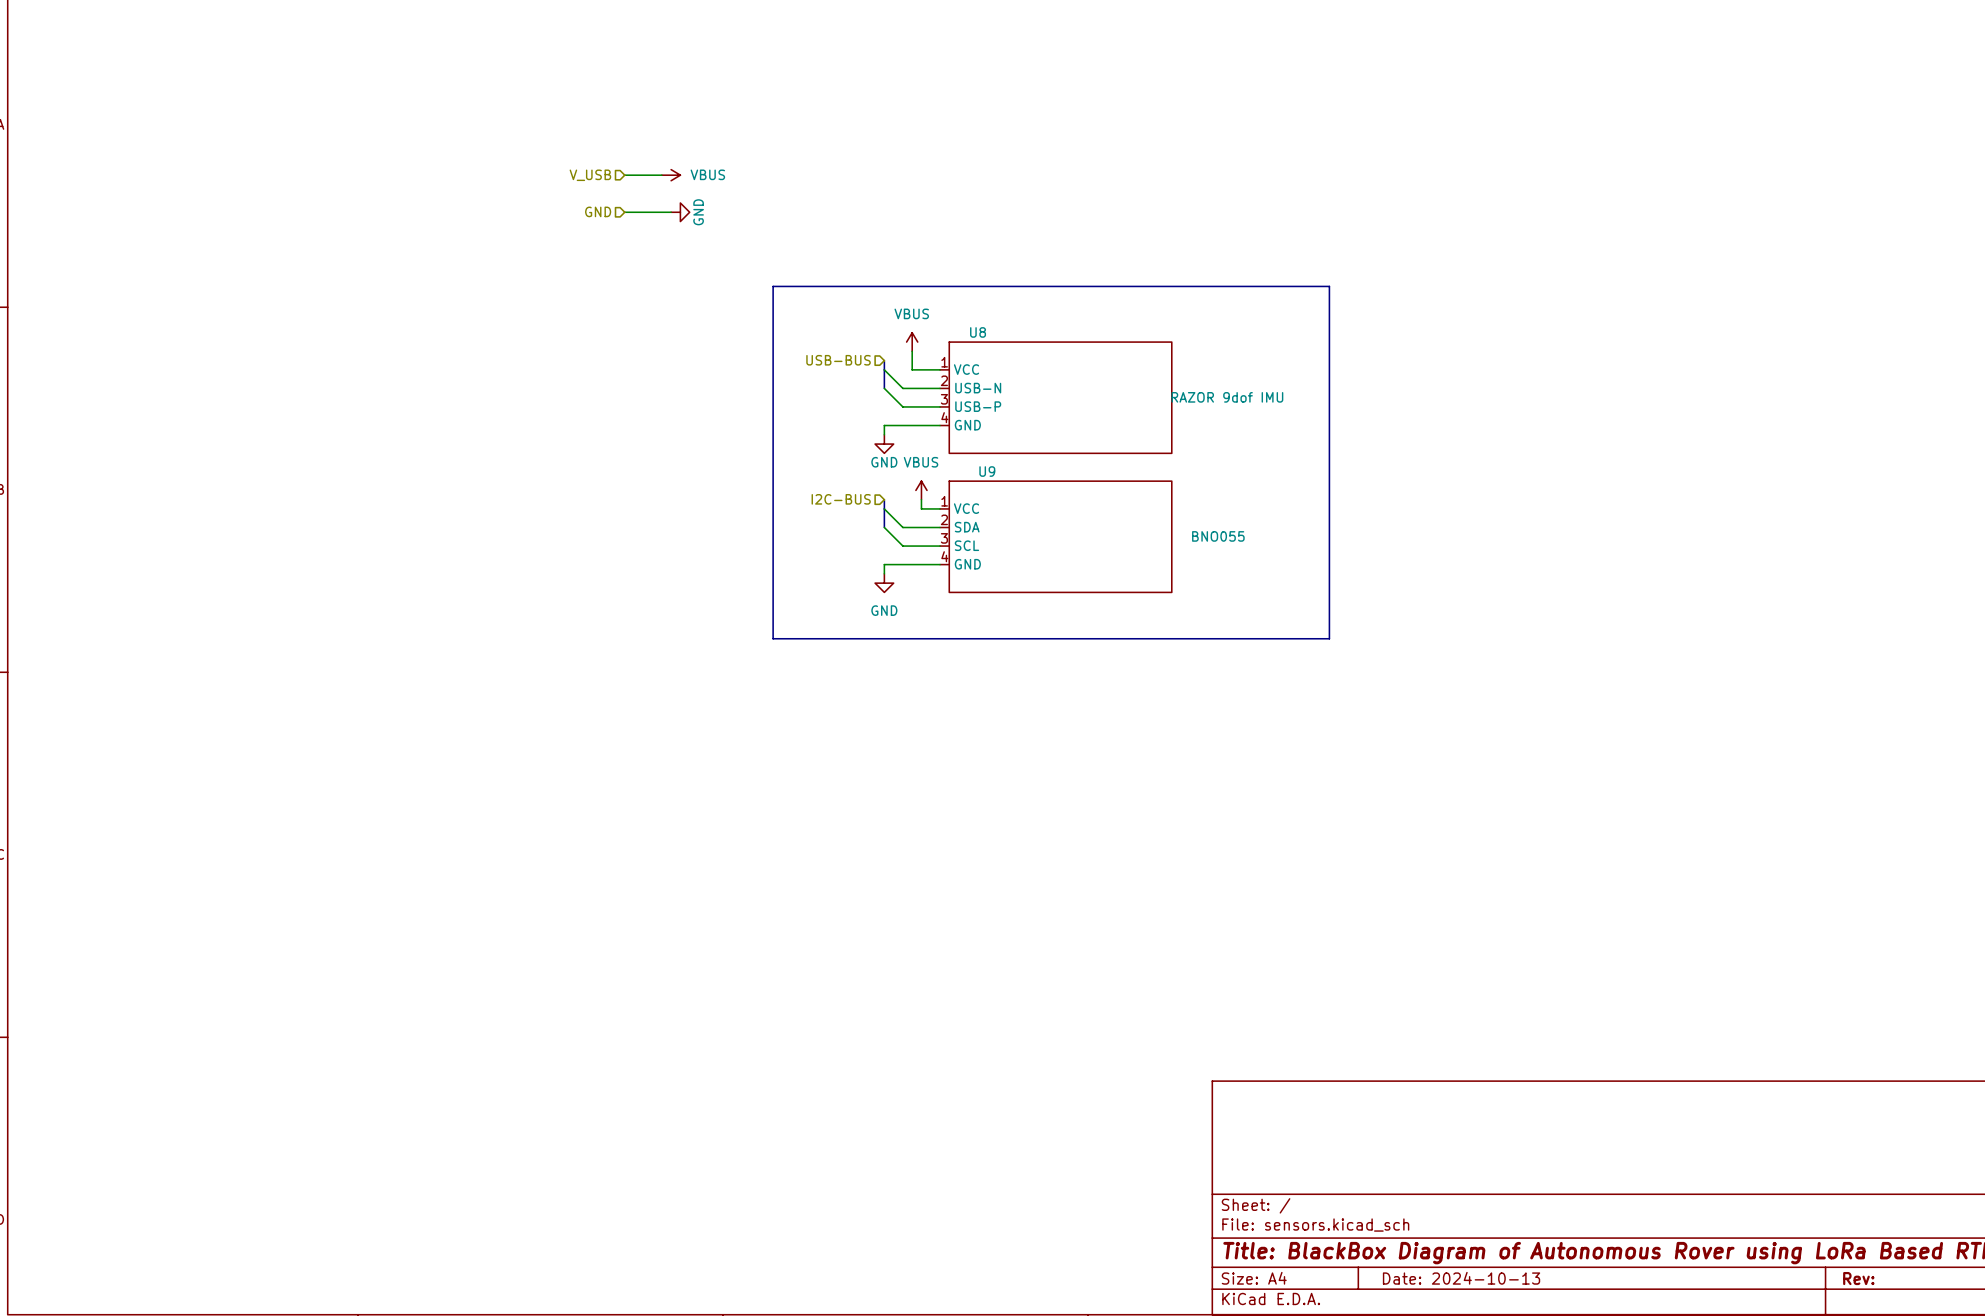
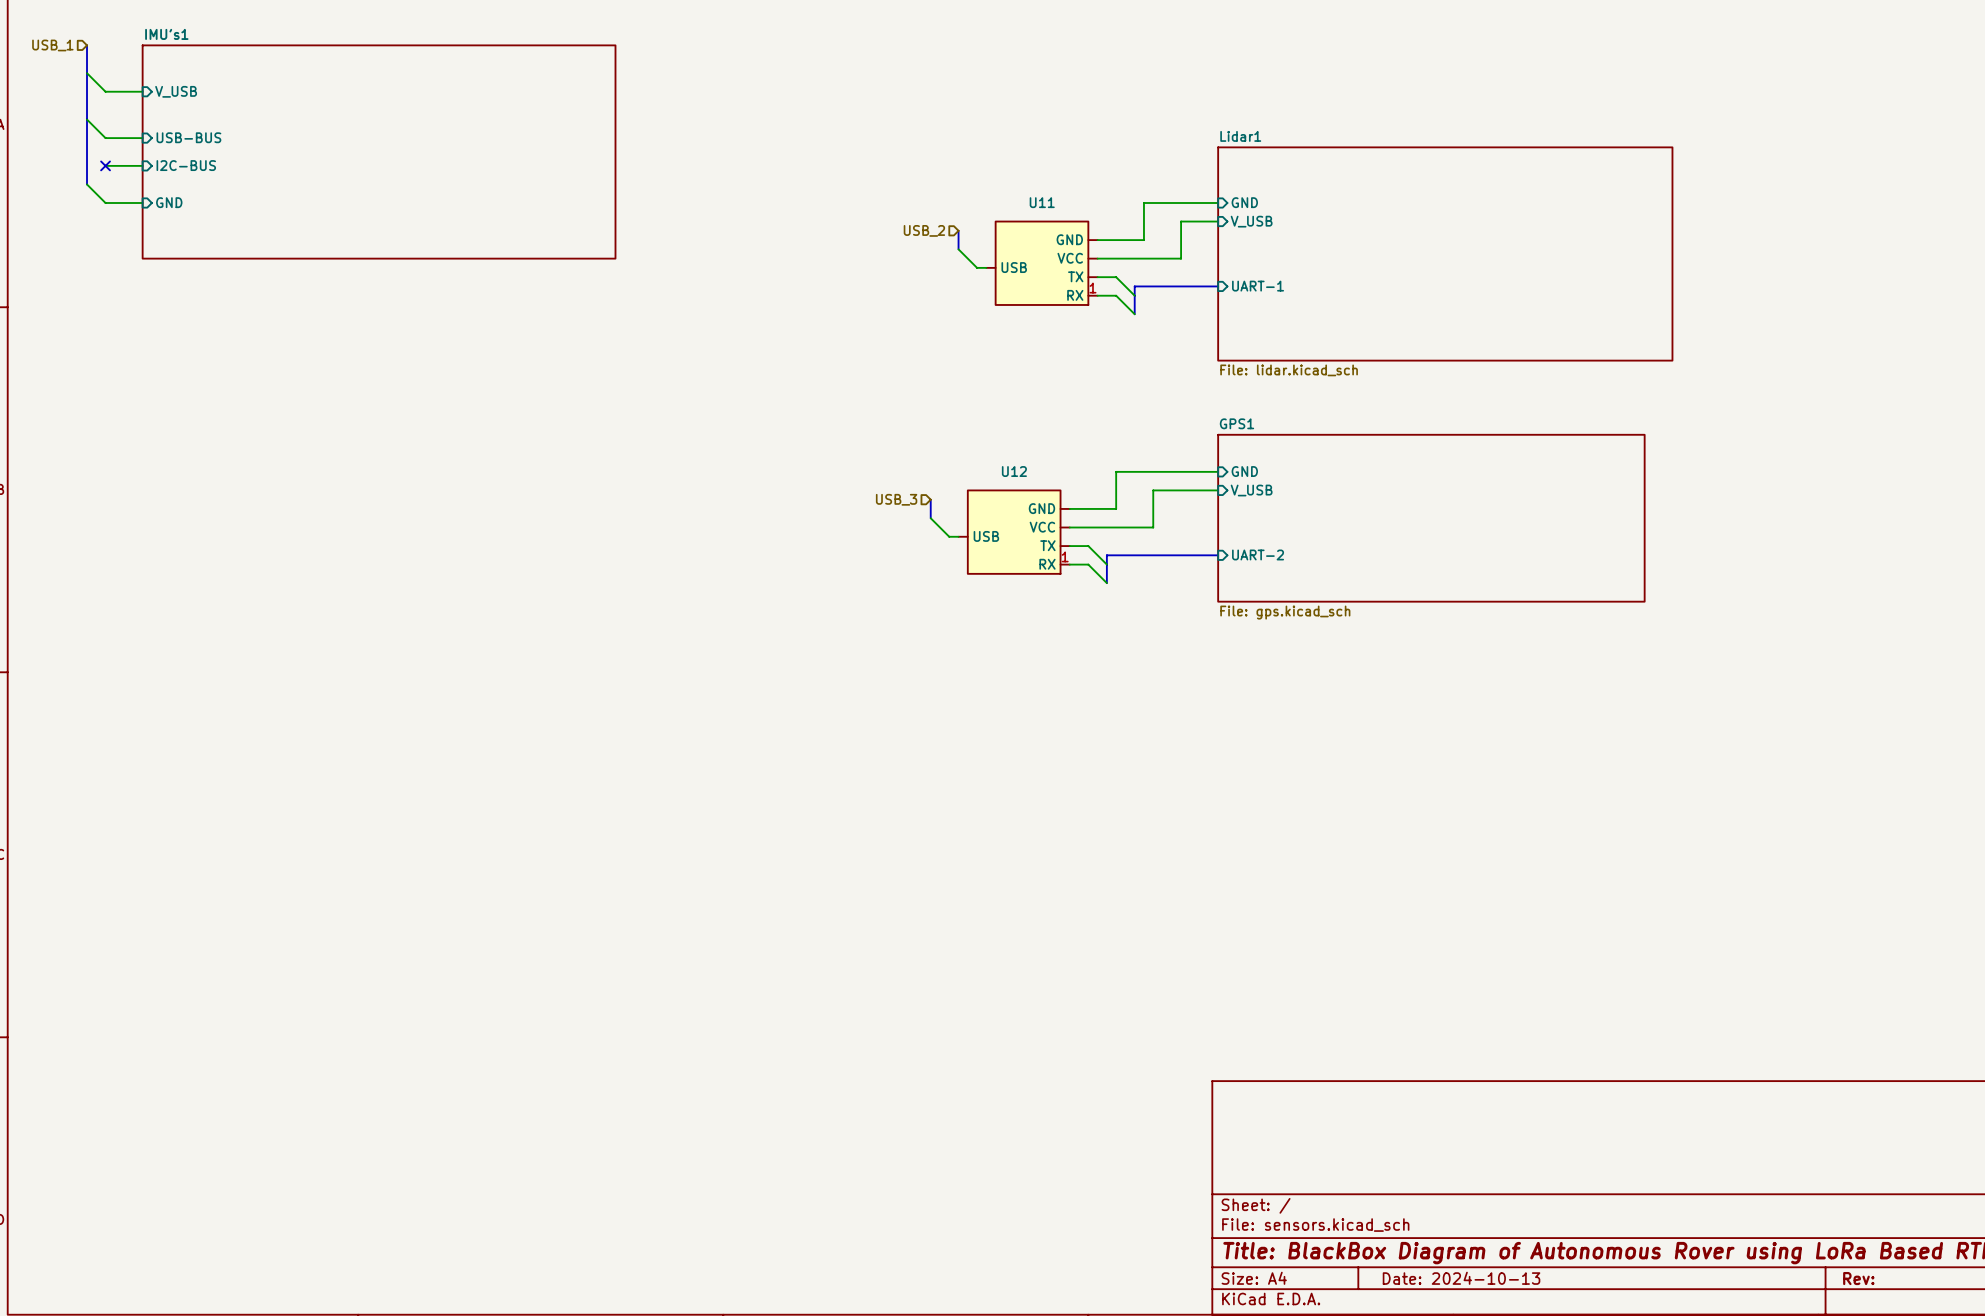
hierarchical label: none -> USB_1 (52, 45)
bus: none -> (87, 45) (87, 184)
wire: none -> (87, 73) (105, 91) (142, 91)
sheet pin: none -> V_USB (176, 91)
wire: none -> (87, 119) (105, 138) (142, 138)
sheet pin: none -> USB-BUS (188, 137)
sheet IMU's1: none -> (379, 152)
wire: none -> (105, 165) (142, 165)
no-connect mark: none -> (105, 165)
sheet pin: none -> I2C-BUS (186, 165)
hierarchical label: V_USB (590, 175) -> none
wire: (624, 175) (661, 175) -> none
power symbol: VBUS (671, 175) -> none
wire: none -> (87, 184) (105, 202) (142, 202)
sheet pin: none -> GND (169, 202)
wire: none -> (1218, 202) (1143, 202) (1143, 240) (1097, 240)
sheet pin: none -> GND (1244, 202)
hierarchical label: GND (598, 211) -> none
wire: (624, 212) (671, 212) -> none
power symbol: GND (680, 212) -> none
wire: none -> (1218, 221) (1181, 221) (1181, 258) (1097, 258)
sheet pin: none -> V_USB (1251, 221)
hierarchical label: none -> USB_2 (924, 230)
bus: none -> (958, 230) (958, 249)
wire: none -> (958, 249) (977, 267) (986, 267)
sheet Lidar1: none -> File: lidar.kicad_sch (1445, 253)
U11: none -> (1041, 263)
wire: none -> (1097, 277) (1116, 277) (1134, 295)
line: (773, 286) (1329, 286) (1329, 638) (773, 638) (773, 286) -> none
bus: none -> (1218, 286) (1134, 286) (1134, 314)
sheet pin: none -> UART-1 (1258, 286)
wire: none -> (1097, 295) (1116, 295) (1134, 314)
power symbol: VBUS (912, 342) -> none
wire: (912, 351) (912, 369) (940, 369) -> none
hierarchical label: USB-BUS (838, 360) -> none
bus: (884, 360) (884, 388) -> none
wire: (884, 369) (902, 388) (940, 388) -> none
wire: (884, 388) (902, 406) (940, 406) -> none
U8: RAZOR 9dof IMU (1055, 397) -> none
wire: (940, 425) (884, 425) (884, 434) -> none
power symbol: GND (884, 444) -> none
wire: none -> (1218, 471) (1116, 471) (1116, 508) (1069, 508)
sheet pin: none -> GND (1244, 471)
power symbol: VBUS (921, 490) -> none
wire: none -> (1218, 490) (1153, 490) (1153, 527) (1069, 527)
sheet pin: none -> V_USB (1251, 490)
hierarchical label: I2C-BUS (841, 499) -> none
bus: (884, 499) (884, 527) -> none
hierarchical label: none -> USB_3 (896, 499)
wire: (921, 499) (921, 508) (940, 508) -> none
bus: none -> (930, 499) (930, 518)
wire: (884, 508) (902, 527) (940, 527) -> none
wire: none -> (930, 518) (949, 536) (958, 536)
sheet GPS1: none -> File: gps.kicad_sch (1431, 518)
wire: (884, 527) (902, 546) (940, 546) -> none
U12: none -> (1014, 532)
U9: BNO055 (1055, 536) -> none
wire: none -> (1069, 546) (1088, 546) (1106, 564)
sheet pin: none -> UART-2 (1258, 554)
bus: none -> (1218, 555) (1106, 555) (1106, 583)
wire: (940, 564) (884, 564) (884, 573) -> none
wire: none -> (1069, 564) (1088, 564) (1106, 583)
power symbol: GND (884, 583) -> none

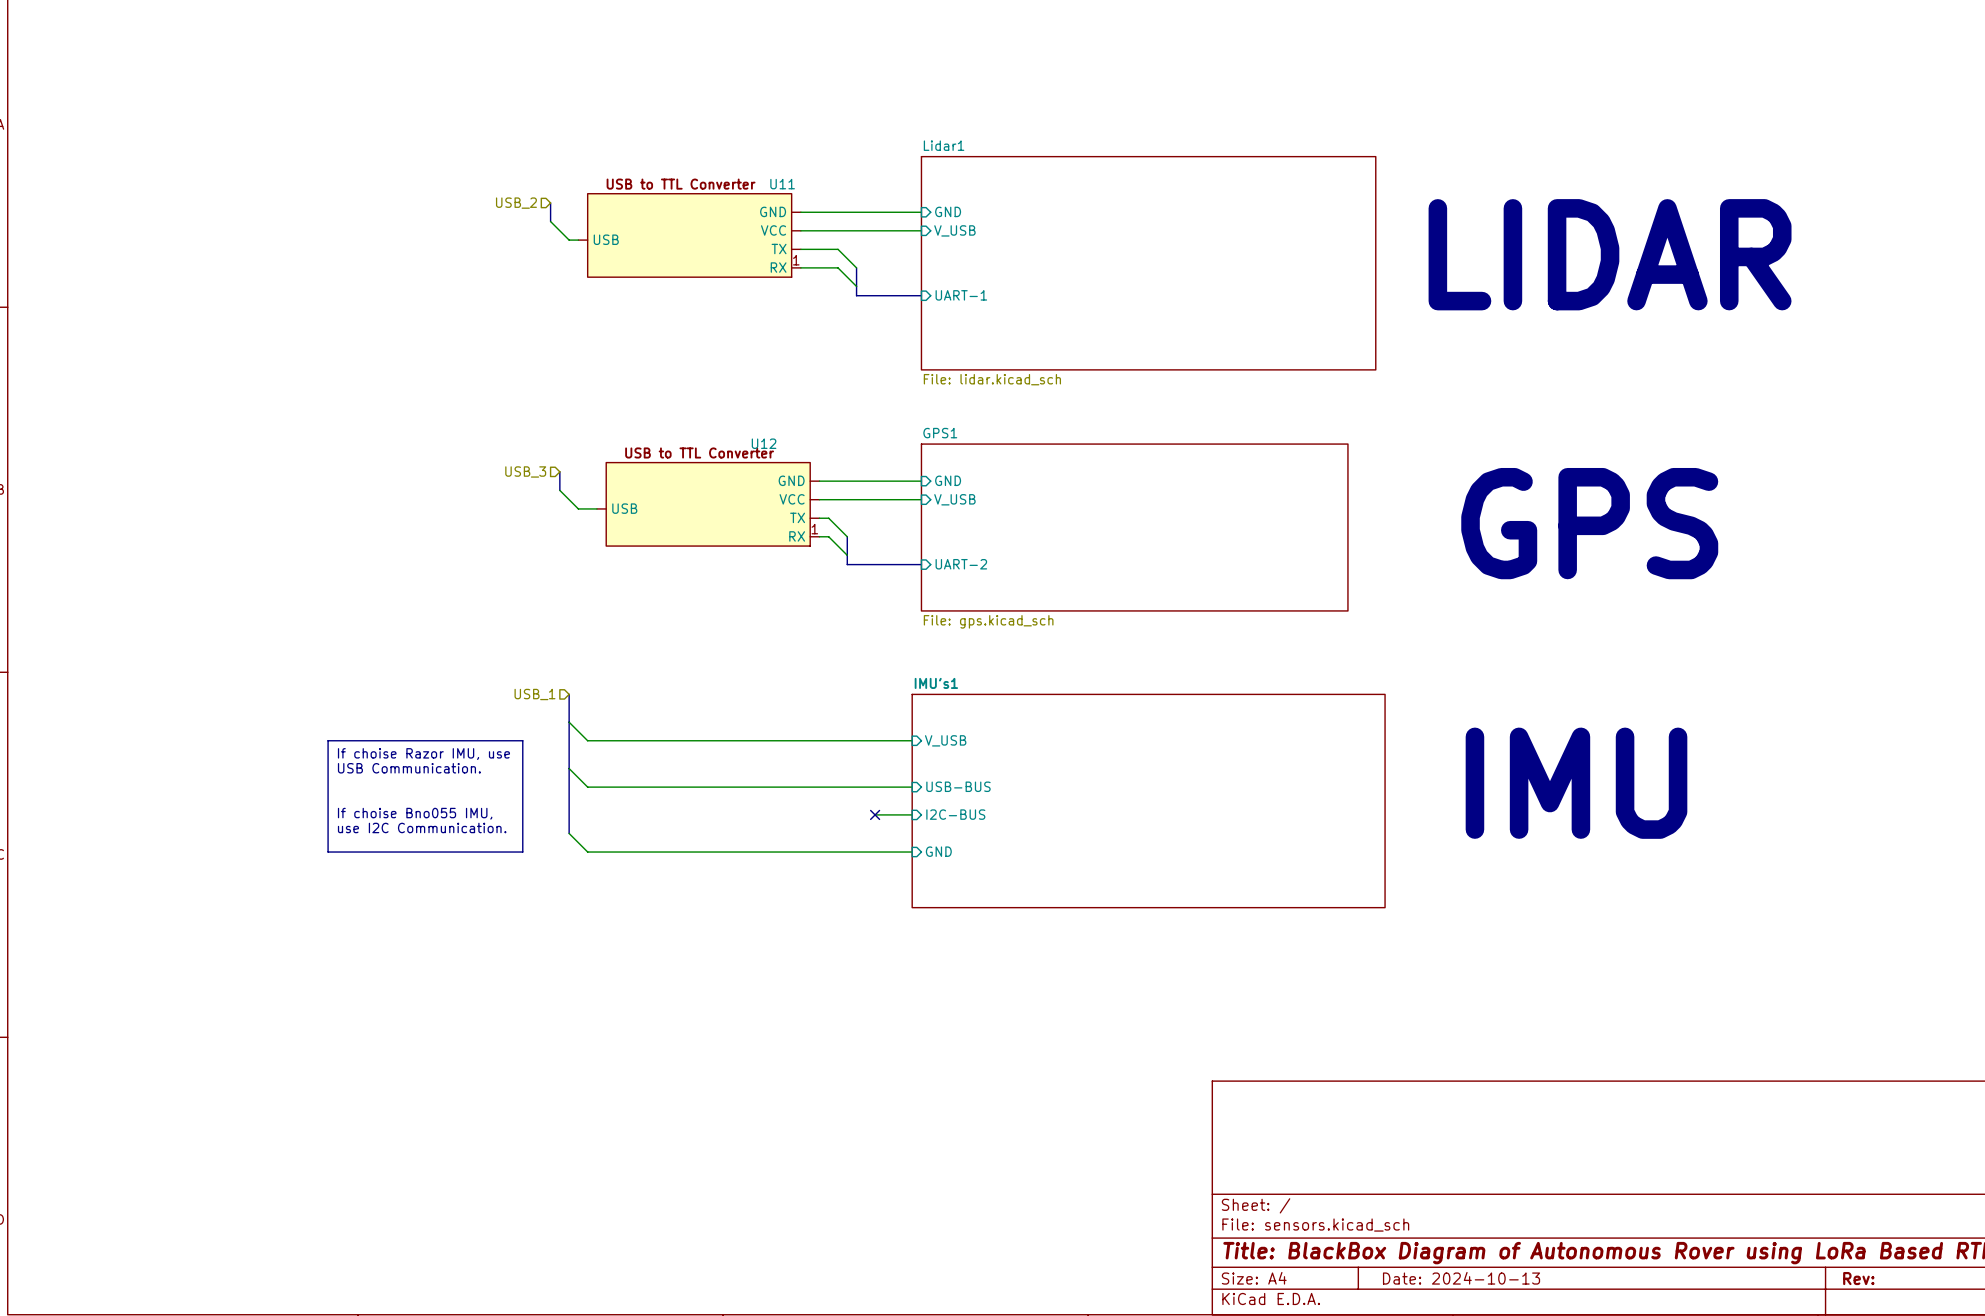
hierarchical label: USB_1 (52, 45) -> none
bus: (87, 45) (87, 184) -> none
wire: (87, 73) (105, 91) (142, 91) -> none
sheet pin: V_USB (176, 91) -> none
wire: (87, 119) (105, 138) (142, 138) -> none
sheet pin: USB-BUS (188, 137) -> none
sheet IMU's1 position: (379, 152) -> (1148, 801)
wire: (105, 165) (142, 165) -> none
no-connect mark: (105, 165) -> none
sheet pin: I2C-BUS (186, 165) -> none
wire: (87, 184) (105, 202) (142, 202) -> none
sheet pin: GND (169, 202) -> none
bus: none -> (550, 202) (550, 221)
U11 name position: U11 (1042, 202) -> U11 (782, 184)
wire: (1218, 202) (1143, 202) (1143, 240) (1097, 240) -> none
sheet pin: GND (1244, 202) -> none
hierarchical label: none -> USB_2 (516, 203)
sheet pin: none -> GND (948, 211)
wire: none -> (800, 212) (921, 212)
wire: none -> (550, 221) (569, 240) (578, 240)
U11 symbol: [986, 221, 1098, 305] -> [578, 193, 801, 278]
wire: (1218, 221) (1181, 221) (1181, 258) (1097, 258) -> none
sheet pin: V_USB (1251, 221) -> none
wire: none -> (800, 230) (921, 230)
hierarchical label: USB_2 (924, 230) -> none
sheet pin: none -> V_USB (954, 230)
bus: (958, 230) (958, 249) -> none
wire: none -> (800, 249) (838, 249) (856, 267)
wire: (958, 249) (977, 267) (986, 267) -> none
sheet Lidar1 position: (1445, 253) -> (1148, 263)
text: none -> LIDAR (1610, 254)
wire: none -> (800, 267) (838, 267) (856, 286)
bus: none -> (856, 267) (856, 295) (921, 295)
wire: (1097, 277) (1116, 277) (1134, 295) -> none
bus: (1218, 286) (1134, 286) (1134, 314) -> none
sheet pin: UART-1 (1258, 286) -> none
sheet pin: none -> UART-1 (961, 295)
wire: (1097, 295) (1116, 295) (1134, 314) -> none
hierarchical label: none -> USB_3 (525, 471)
bus: none -> (559, 471) (559, 490)
U12 name position: U12 (1014, 471) -> U12 (764, 443)
wire: (1218, 471) (1116, 471) (1116, 508) (1069, 508) -> none
sheet pin: GND (1244, 471) -> none
sheet pin: none -> GND (948, 480)
wire: none -> (819, 481) (921, 481)
wire: none -> (559, 490) (578, 508) (596, 508)
U12 symbol: [958, 490, 1070, 574] -> [596, 462, 820, 547]
wire: (1218, 490) (1153, 490) (1153, 527) (1069, 527) -> none
sheet pin: V_USB (1251, 490) -> none
wire: none -> (819, 499) (921, 499)
hierarchical label: USB_3 (896, 499) -> none
bus: (930, 499) (930, 518) -> none
sheet pin: none -> V_USB (954, 499)
wire: none -> (819, 518) (828, 518) (847, 536)
wire: (930, 518) (949, 536) (958, 536) -> none
sheet GPS1 position: (1431, 518) -> (1134, 527)
text: none -> GPS (1589, 523)
wire: none -> (819, 536) (828, 536) (847, 555)
bus: none -> (847, 536) (847, 564) (921, 564)
wire: (1069, 546) (1088, 546) (1106, 564) -> none
sheet pin: UART-2 (1258, 554) -> none
bus: (1218, 555) (1106, 555) (1106, 583) -> none
sheet pin: none -> UART-2 (961, 564)
wire: (1069, 564) (1088, 564) (1106, 583) -> none
hierarchical label: none -> USB_1 (534, 694)
bus: none -> (569, 694) (569, 833)
wire: none -> (569, 722) (587, 740) (912, 740)
line: none -> (328, 740) (522, 740) (522, 852) (328, 852) (328, 740)
sheet pin: none -> V_USB (945, 740)
text: none -> If choise Razor IMU, use (423, 754)
text: none -> USB Communication. (409, 768)
wire: none -> (569, 768) (587, 787) (912, 787)
text: none -> IMU (1576, 783)
sheet pin: none -> USB-BUS (958, 786)
text: none -> If choise Bno055 IMU, (415, 813)
wire: none -> (875, 814) (912, 814)
no-connect mark: none -> (875, 814)
sheet pin: none -> I2C-BUS (955, 814)
text: none -> use I2C Communication. (422, 827)
wire: none -> (569, 833) (587, 852) (912, 852)
sheet pin: none -> GND (938, 851)

